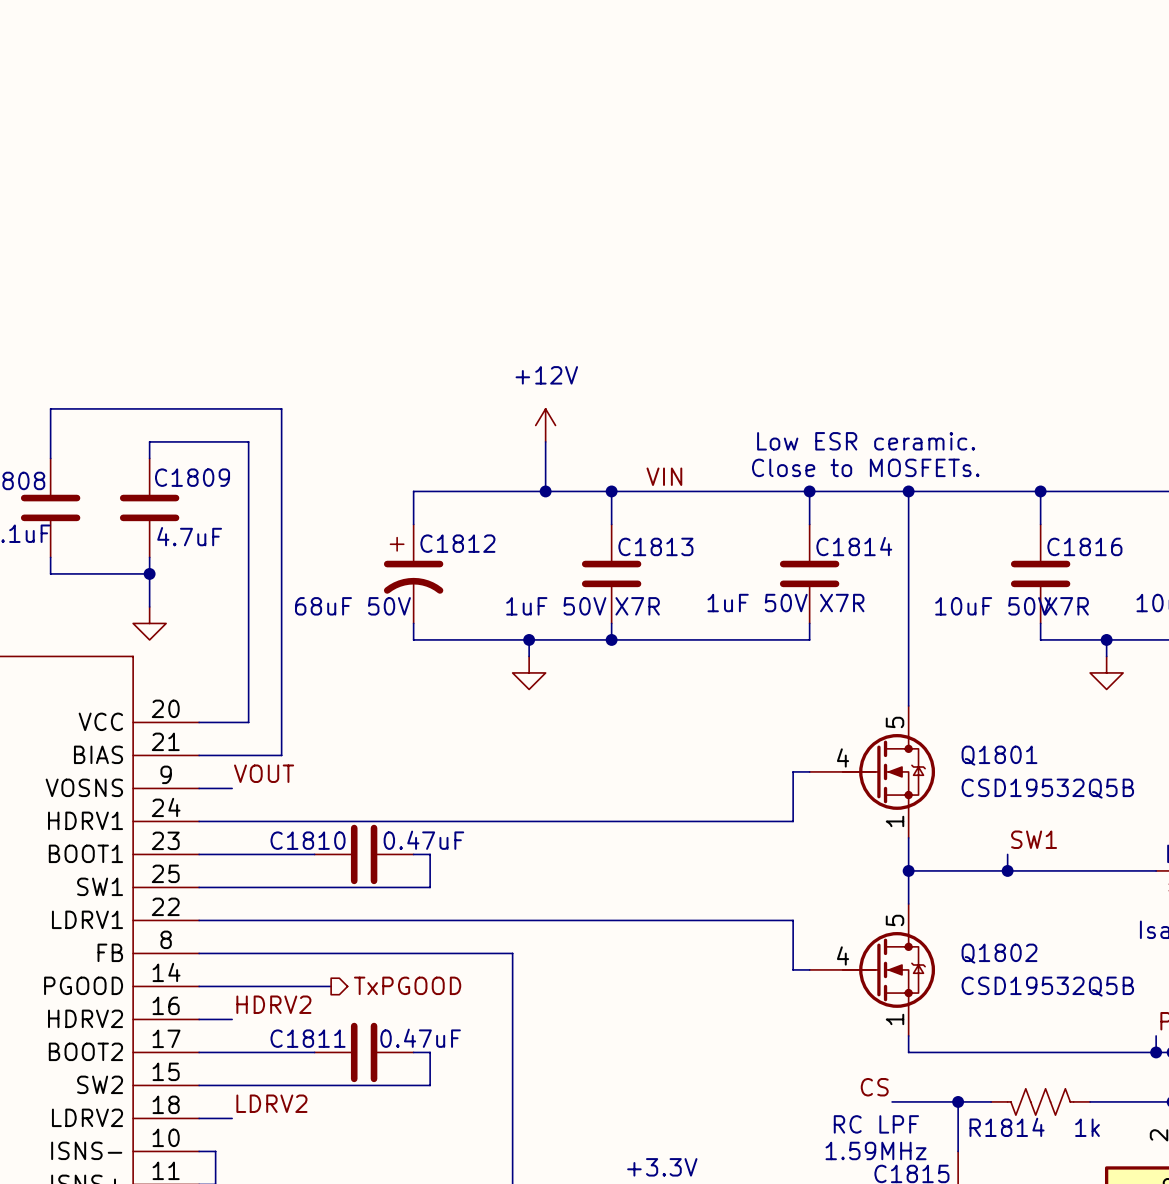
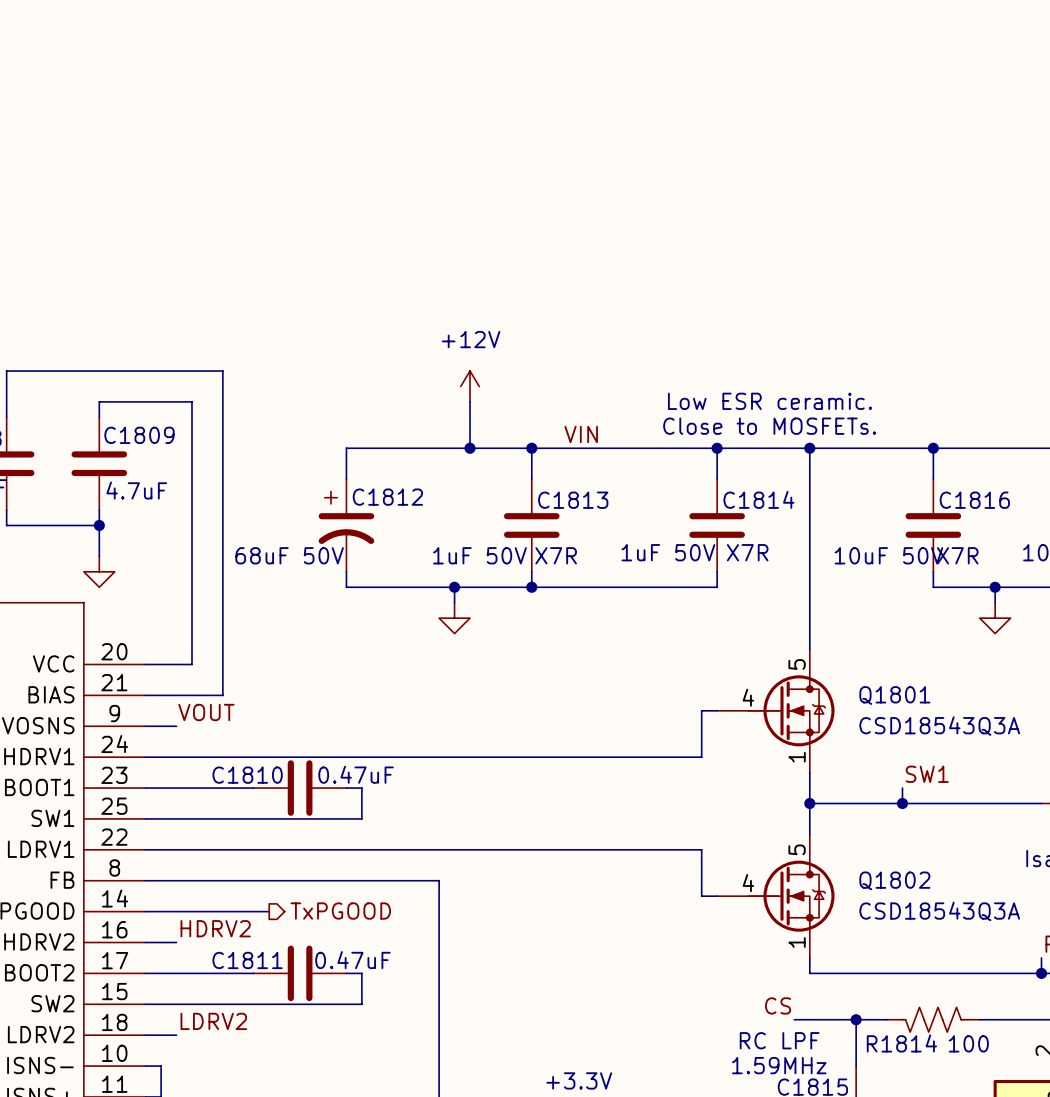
Q1801 value: CSD19532Q5B (1047, 788) -> CSD18543Q3A (939, 726)
Q1802 value: CSD19532Q5B (1047, 986) -> CSD18543Q3A (939, 911)
R1814 value: 1k (1087, 1127) -> 100 (968, 1043)

